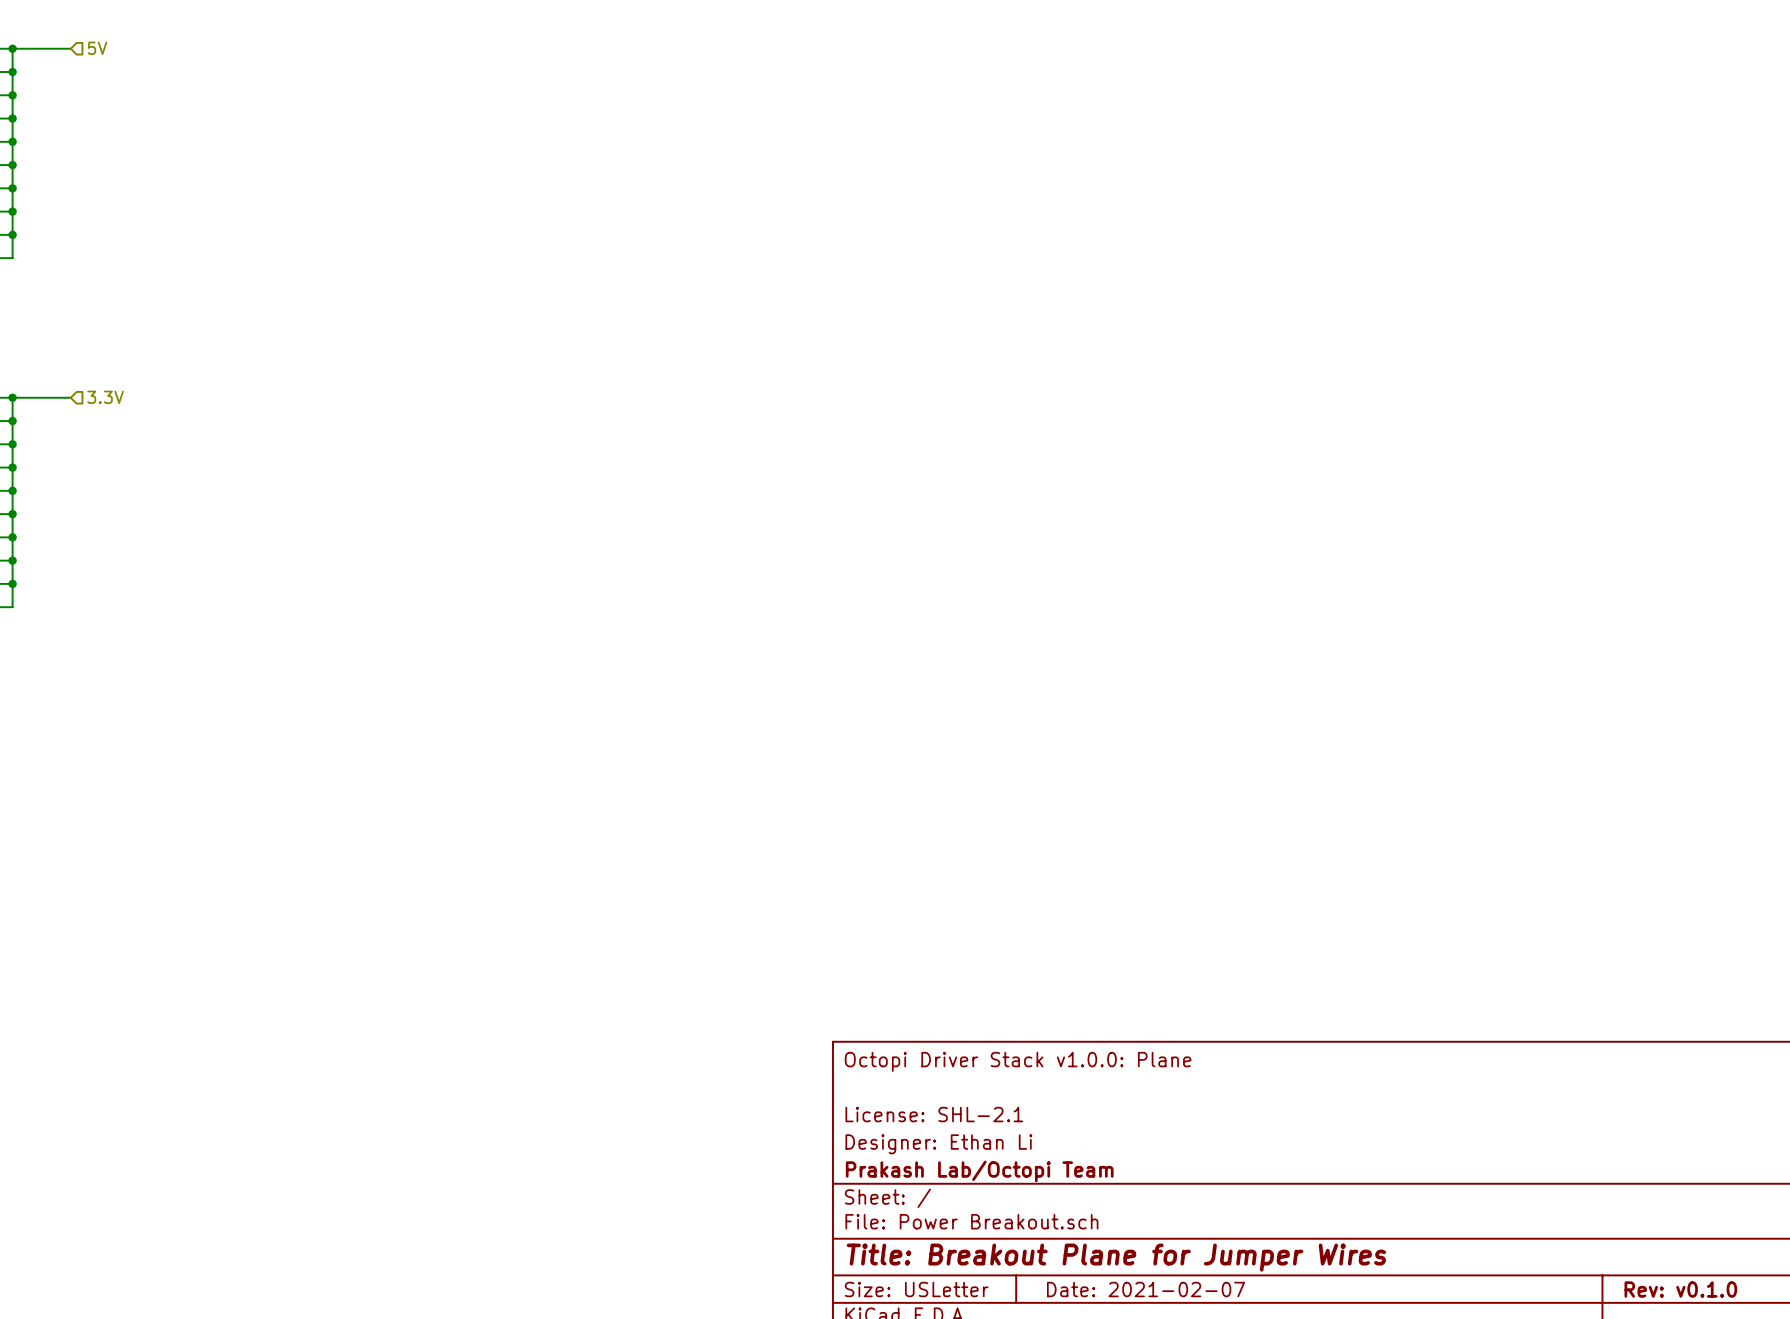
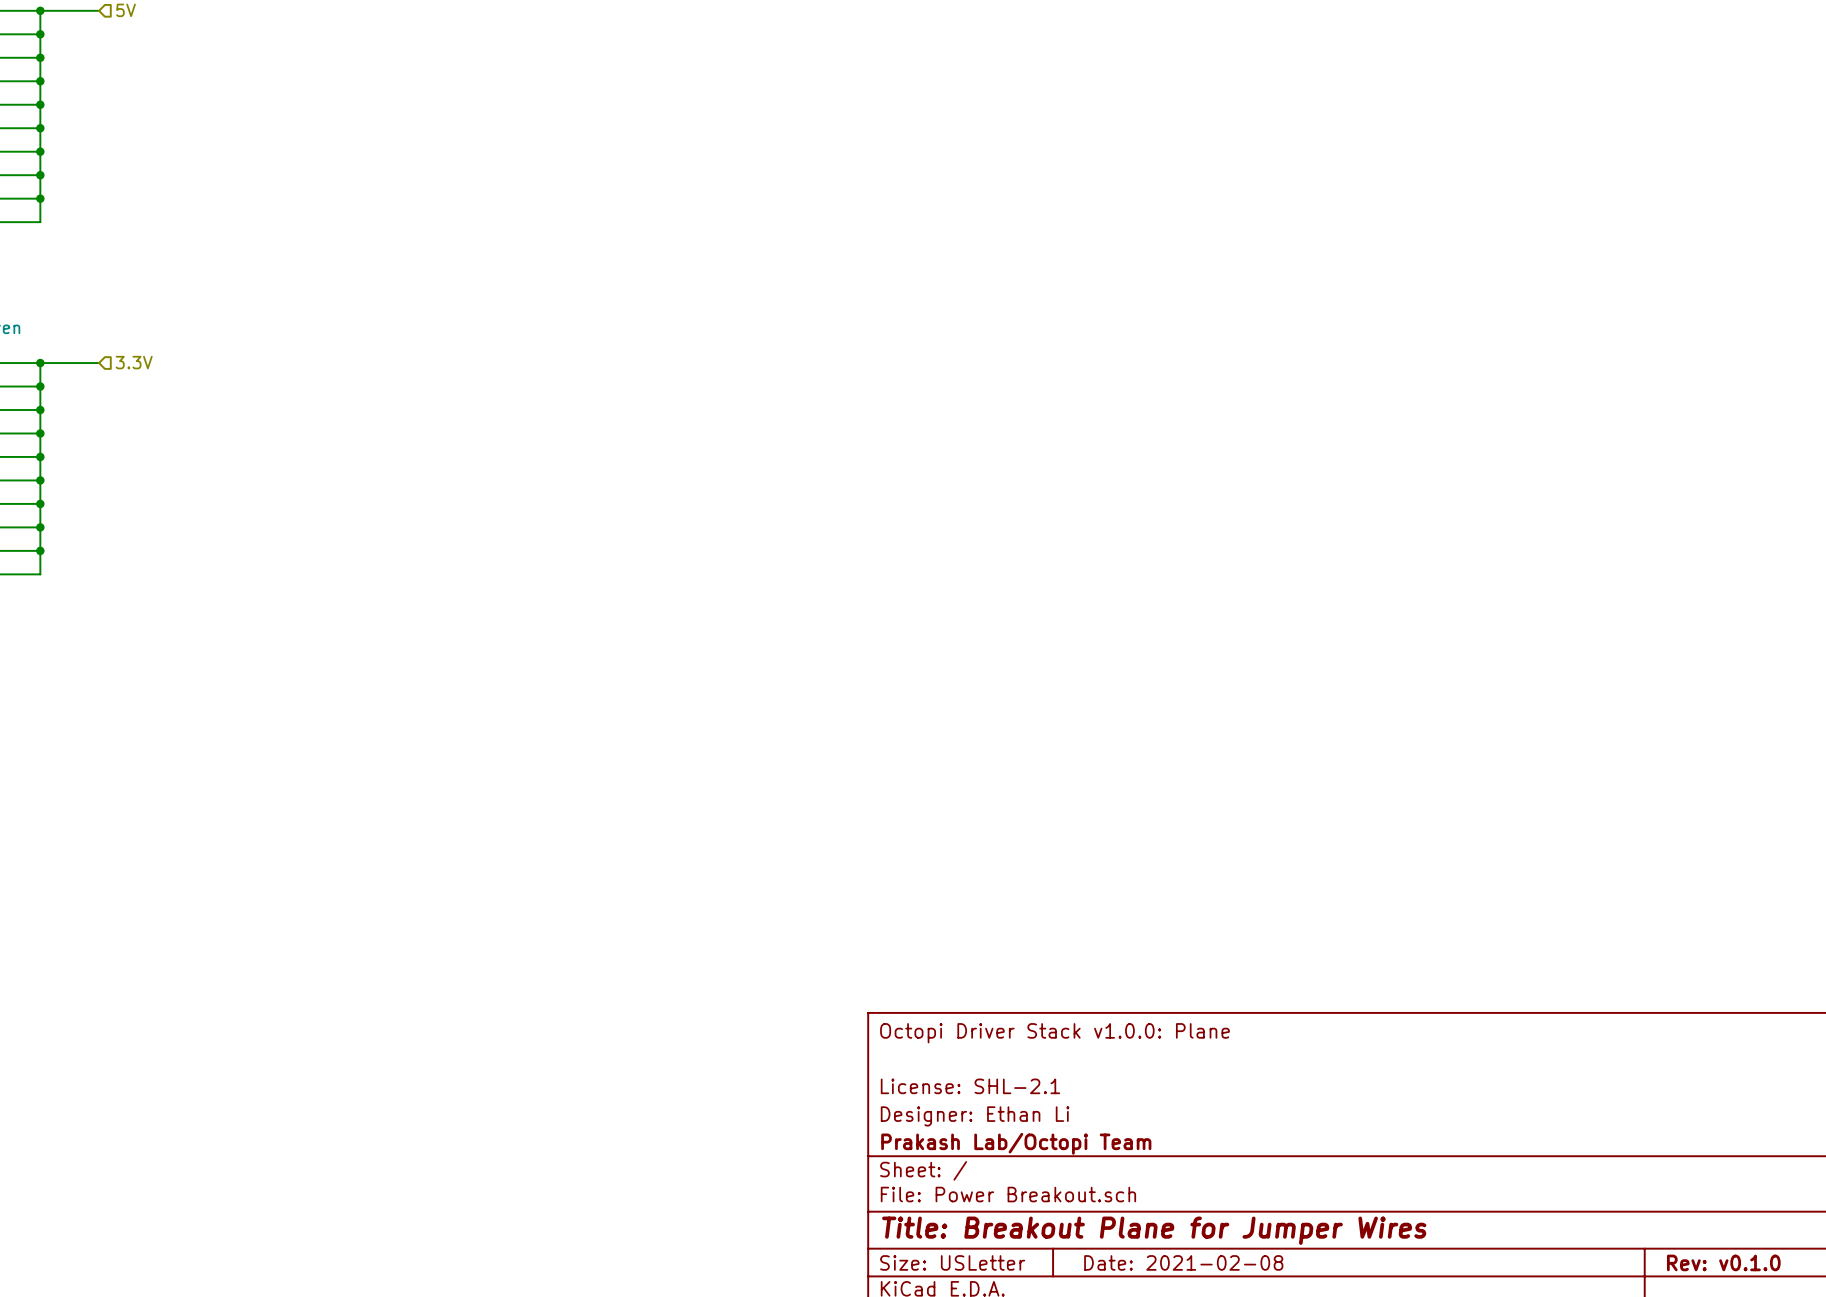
title block: Date: 2021-02-07 (1146, 1289) -> Date: 2021-02-08 (1183, 1262)

